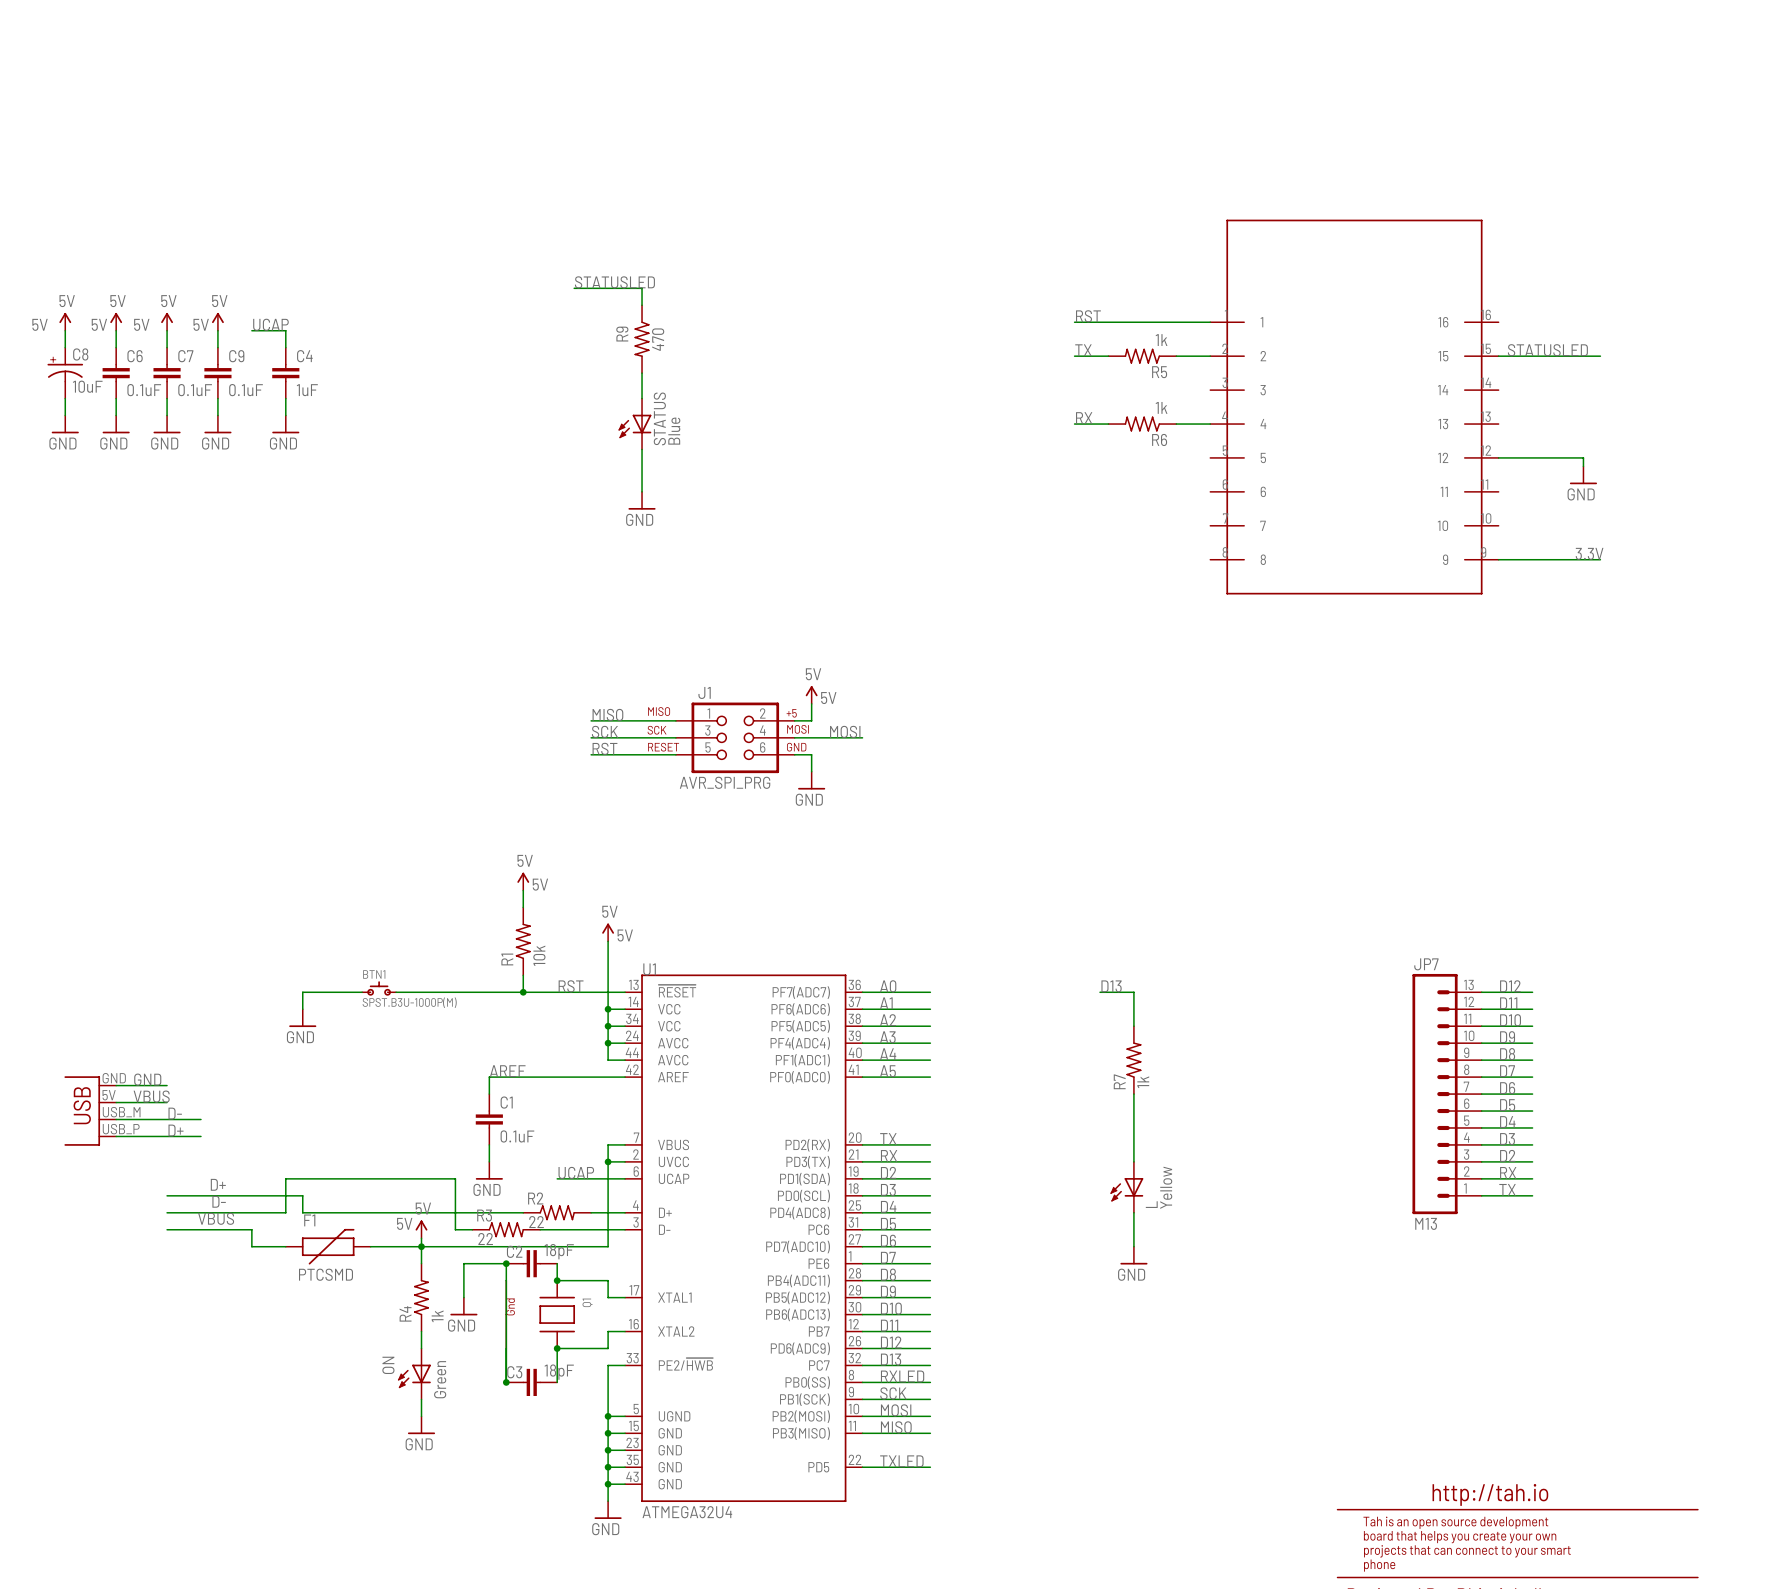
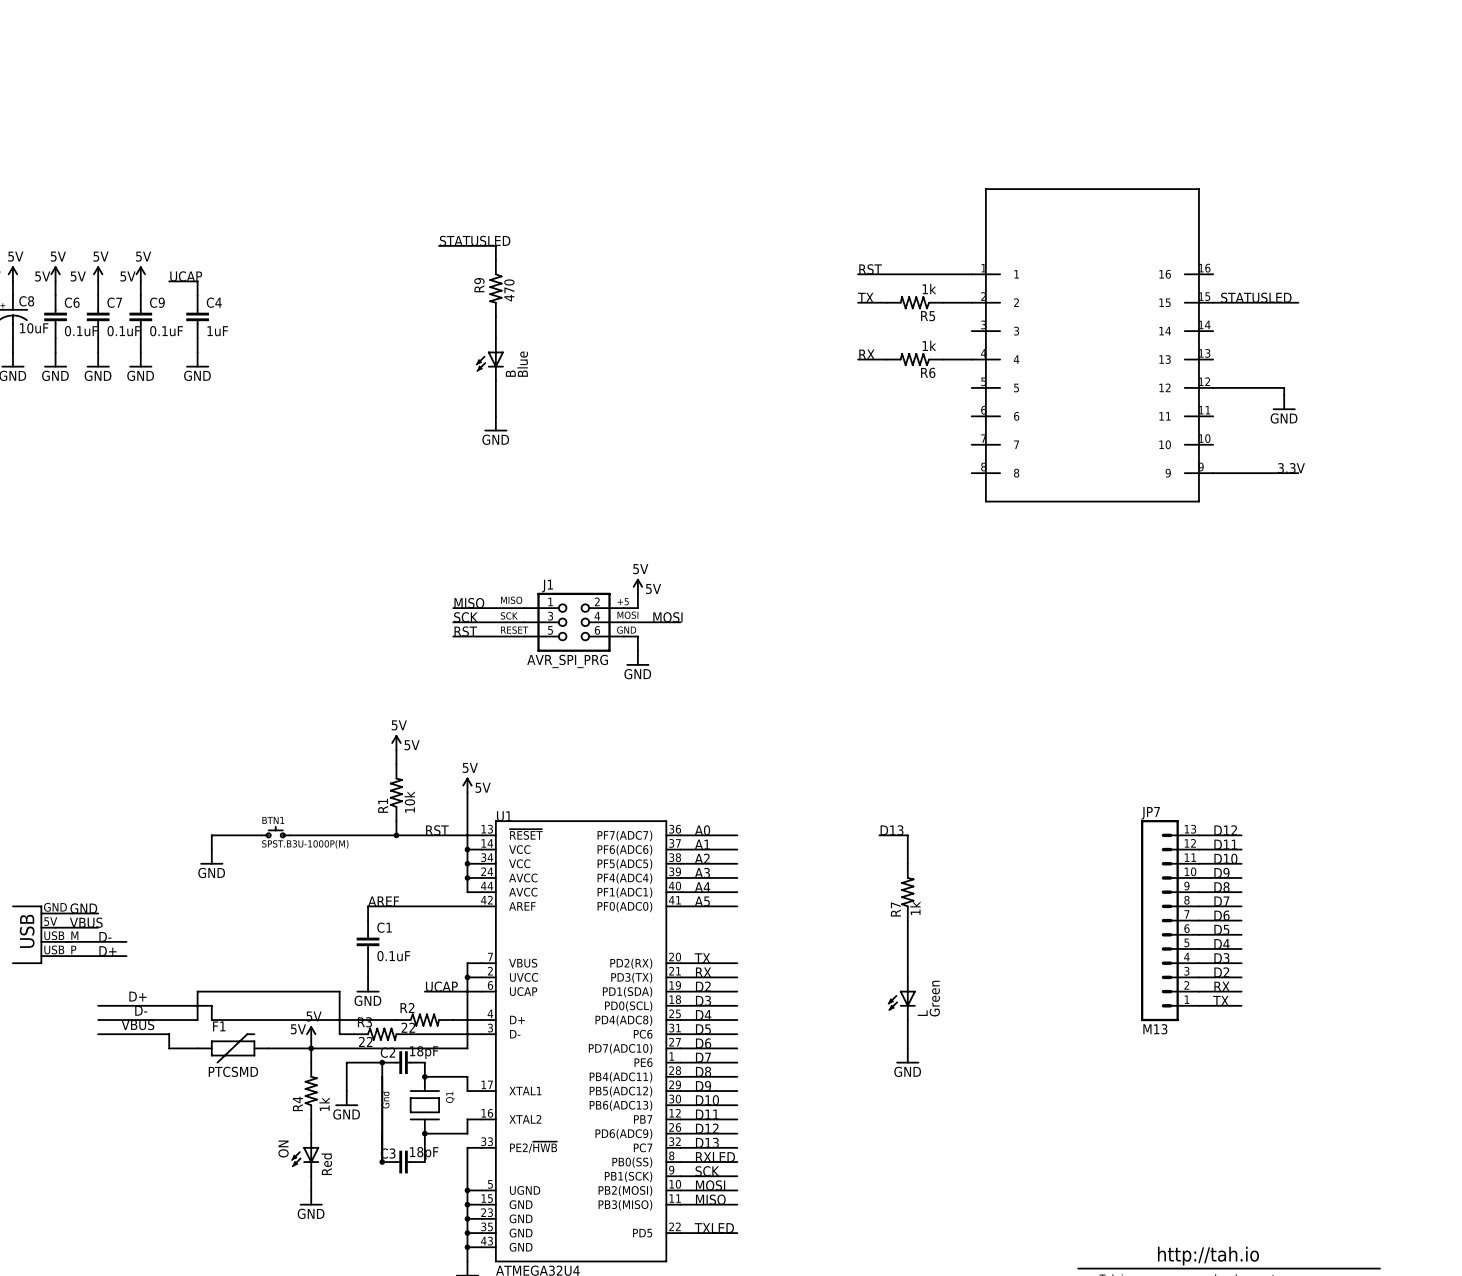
STATUS name: STATUS (659, 418) -> B (510, 373)
L value: Yellow (1166, 1187) -> Green (934, 998)
ON value: Green (440, 1379) -> Red (326, 1164)

